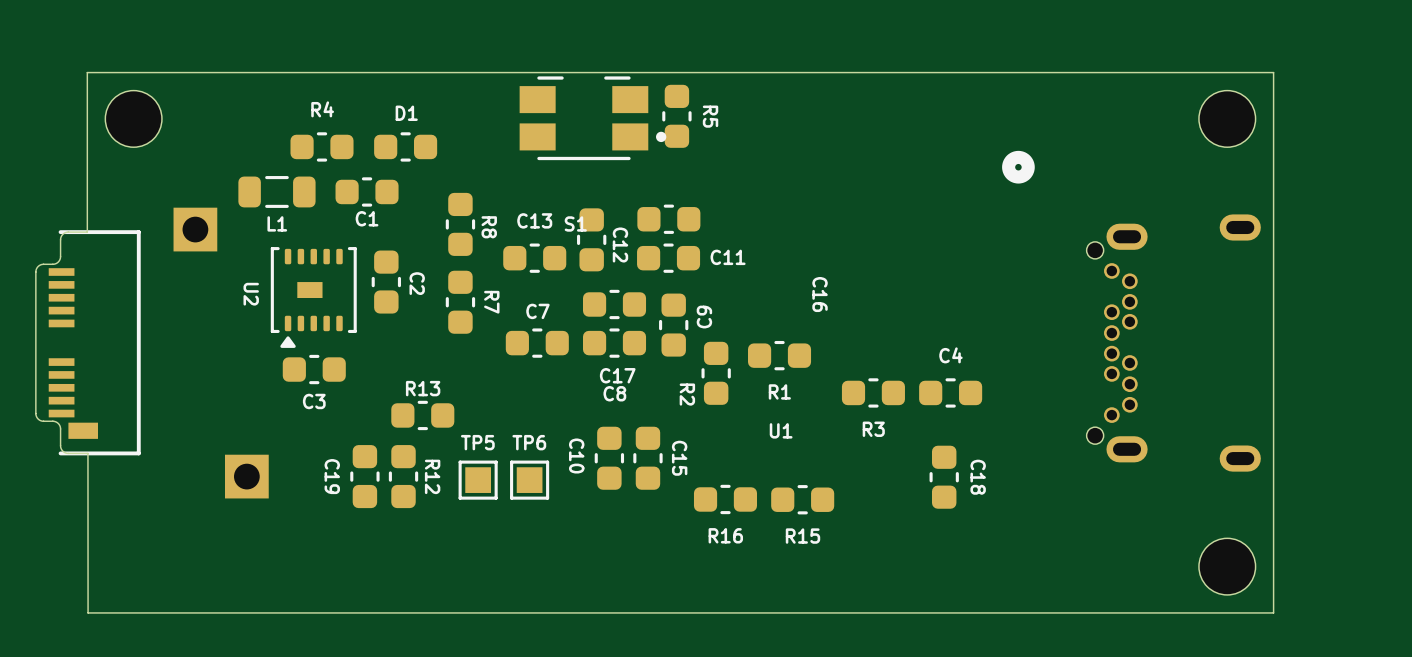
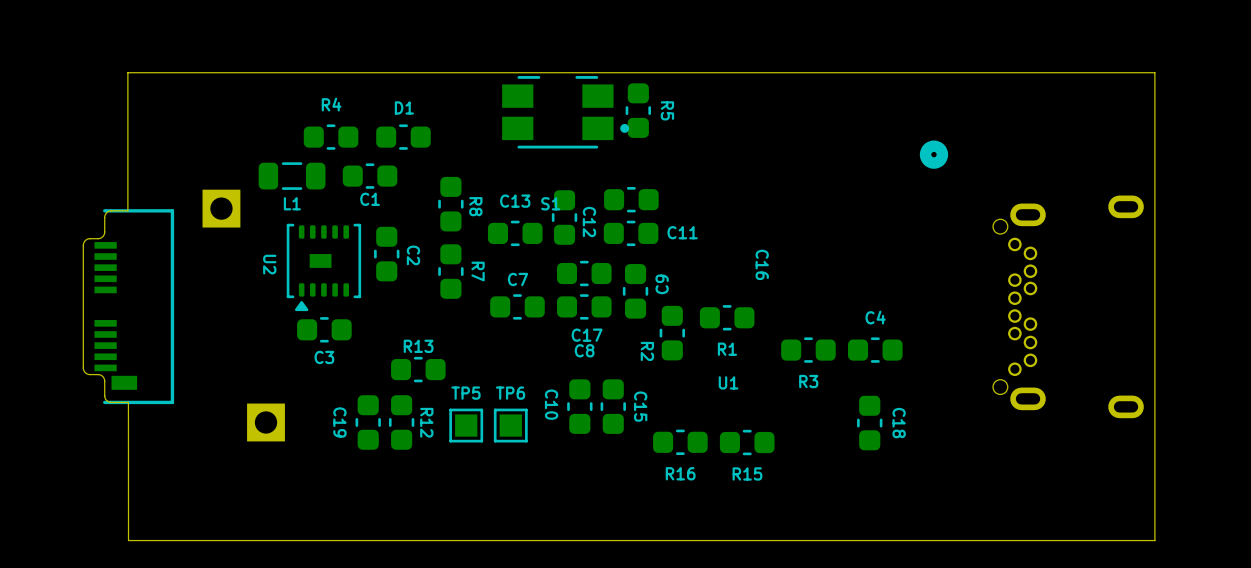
part: (133, 118) -> none
part: (1227, 118) -> none
part: (1227, 566) -> none

